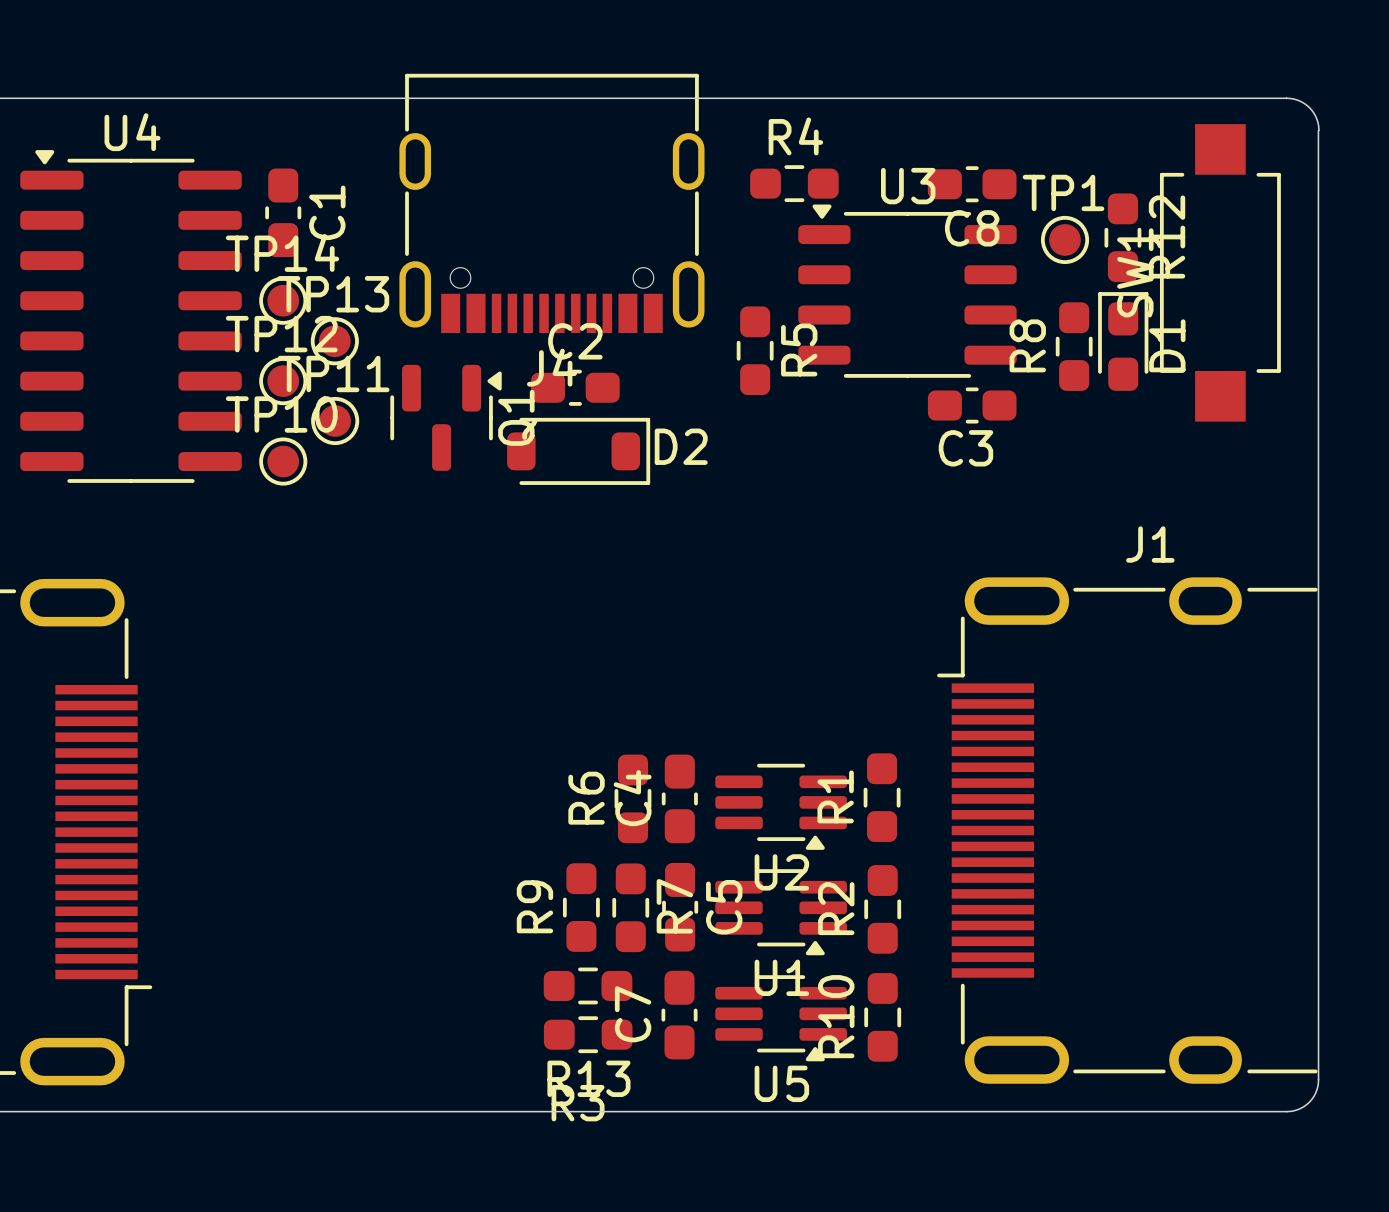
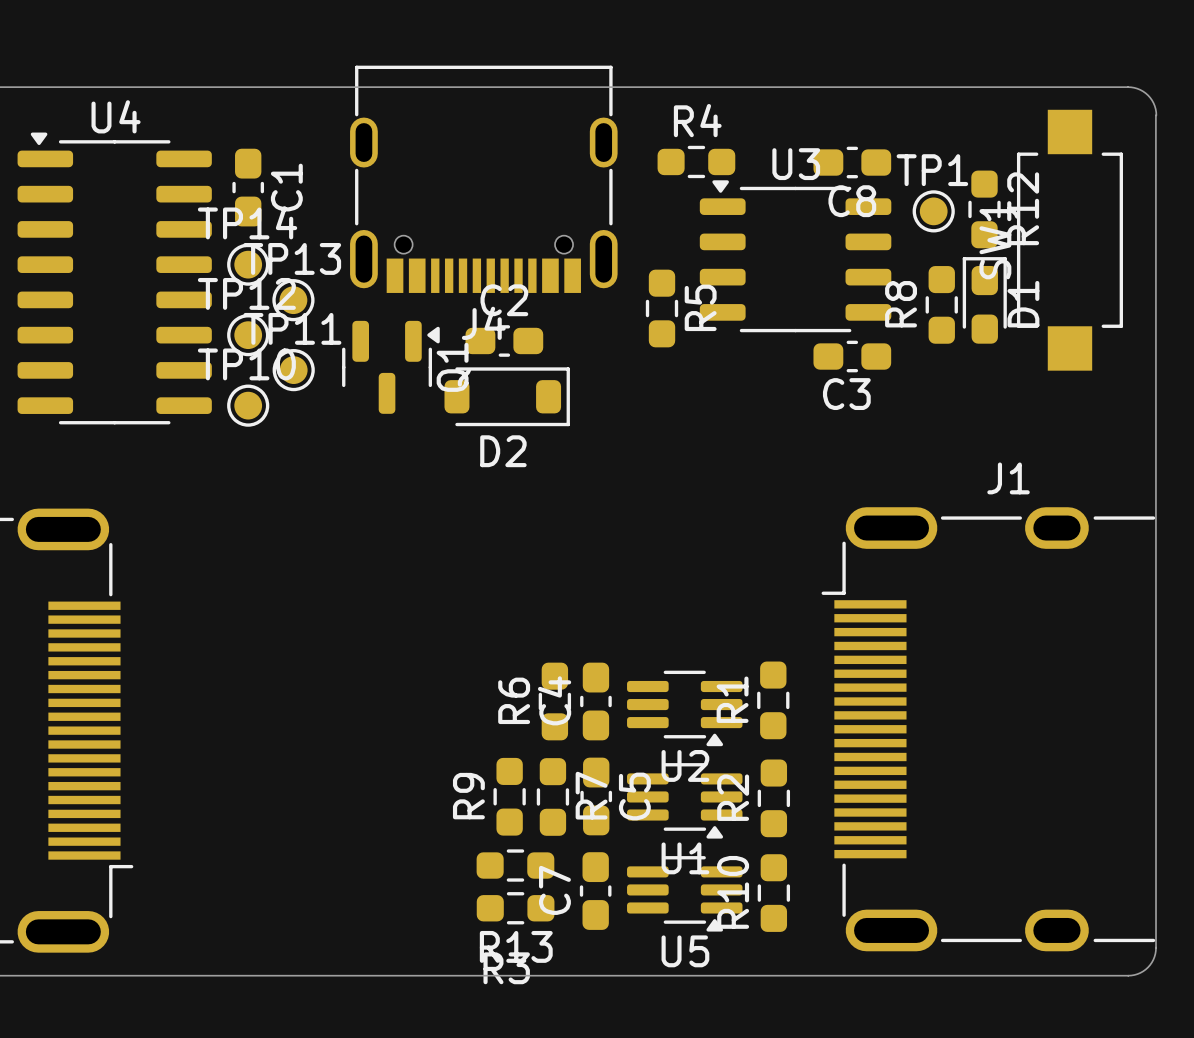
D2 name position: D2 (681, 446) -> D2 (503, 451)

